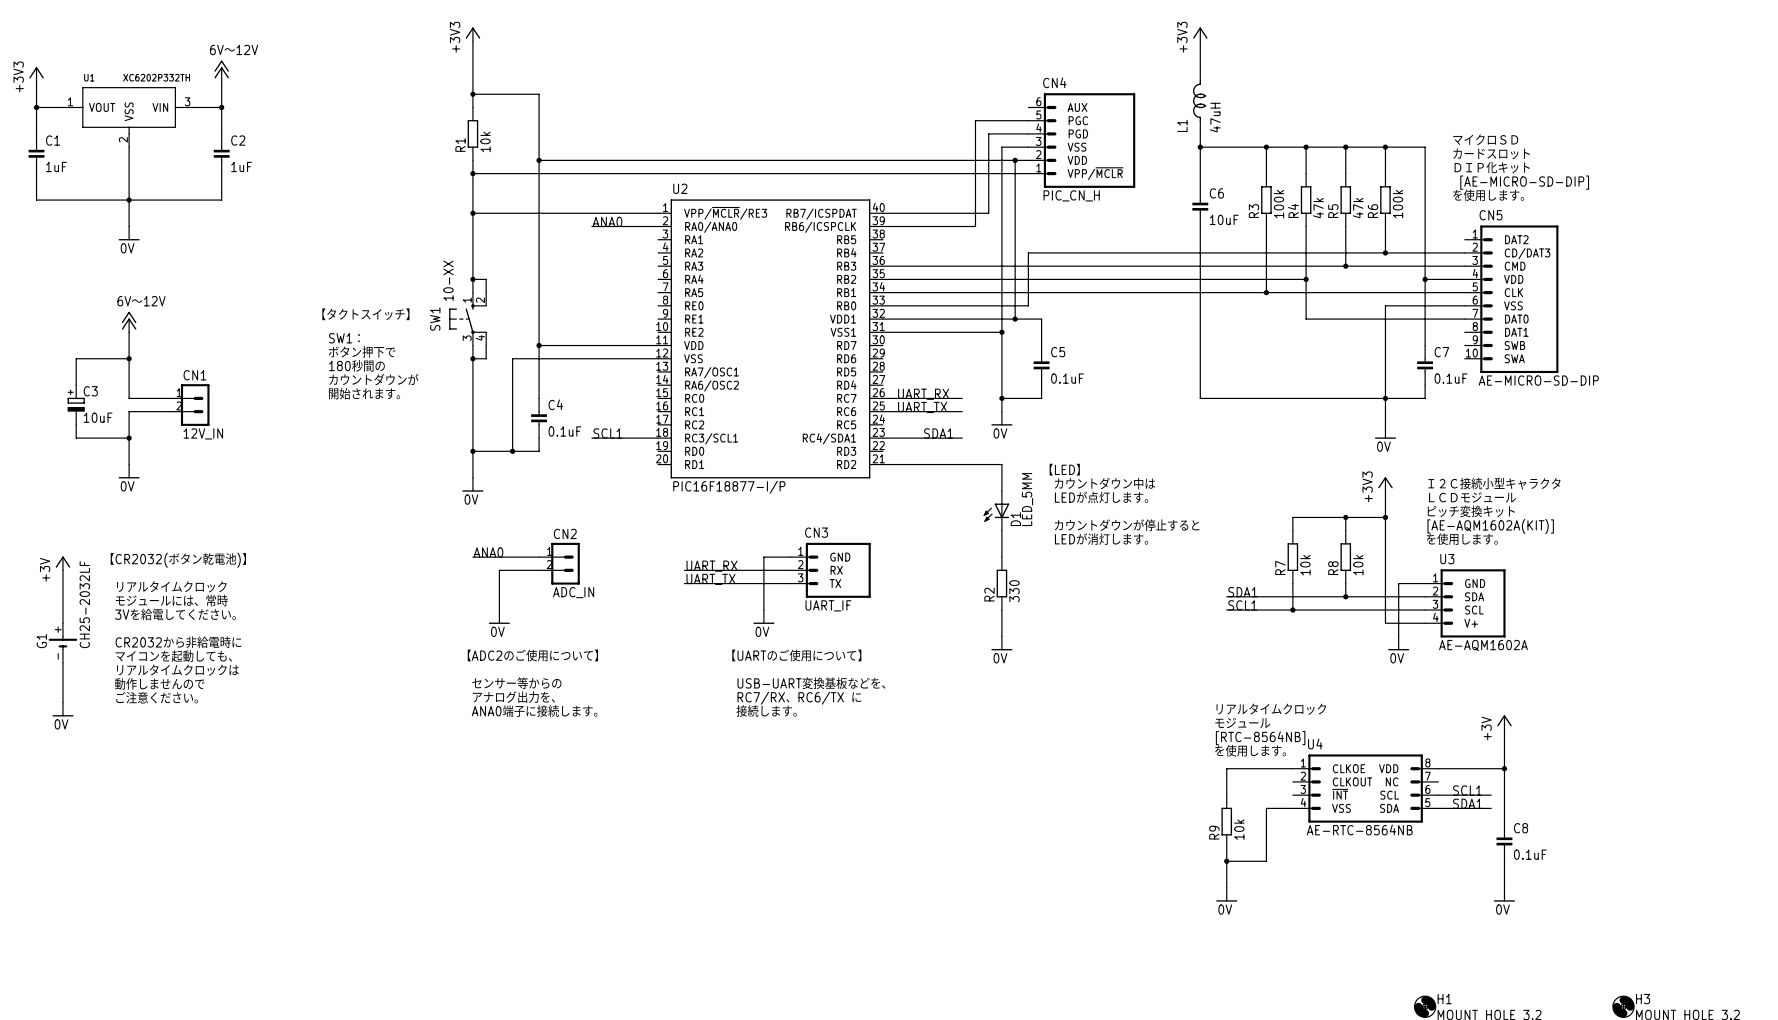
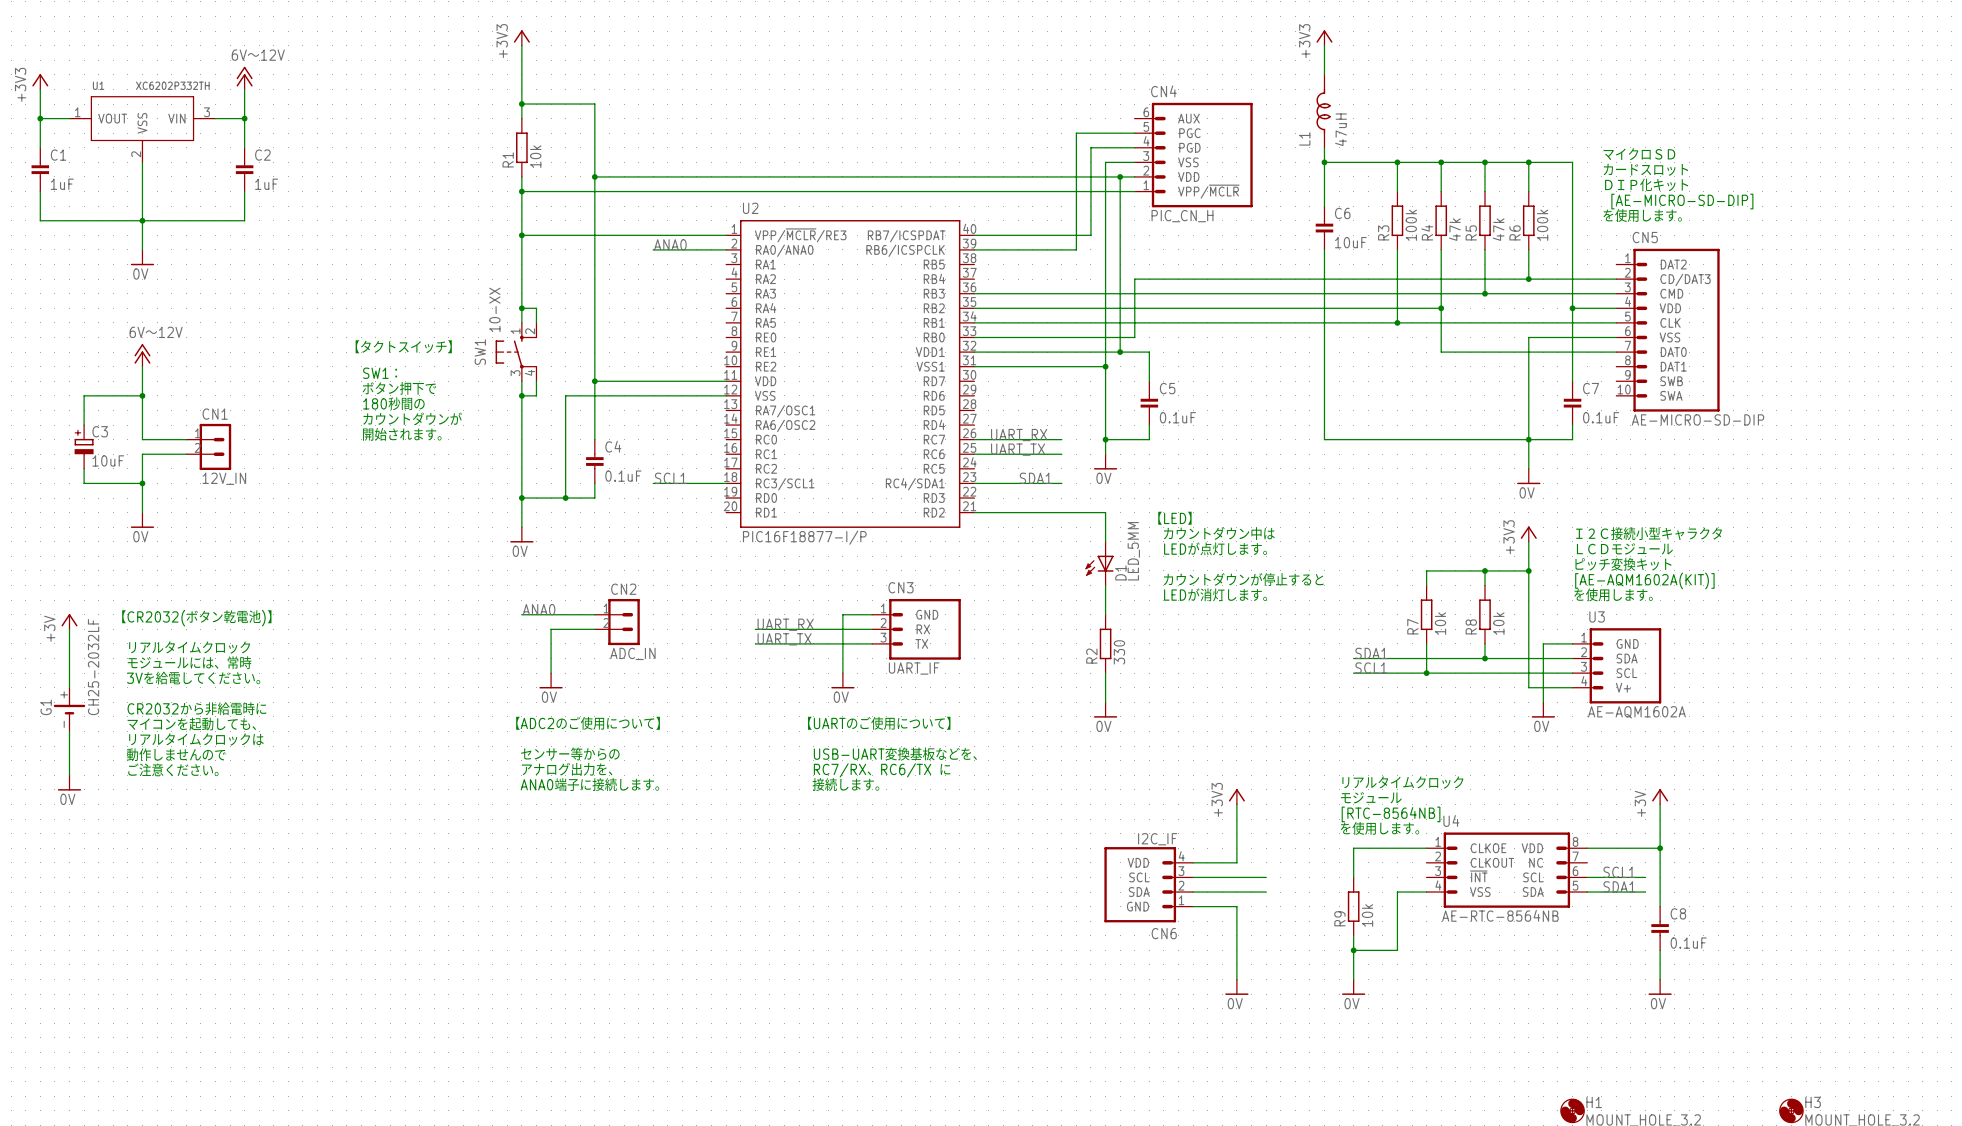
power symbol: none -> +3V3 (1236, 796)
wire: none -> (1236, 804) (1236, 862) (1193, 862)
wire: none -> (1193, 877) (1266, 877)
CN6: none -> I2C_IF (1148, 884)
wire: none -> (1193, 892) (1266, 892)
wire: none -> (1193, 906) (1236, 906) (1236, 979)
power symbol: none -> 0V (1236, 987)

